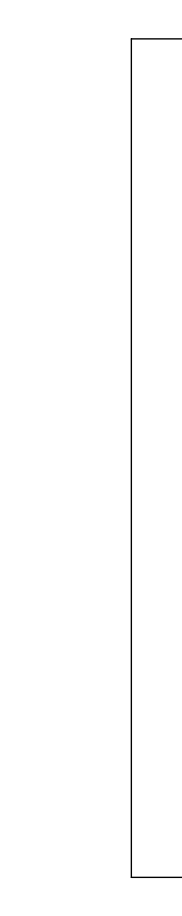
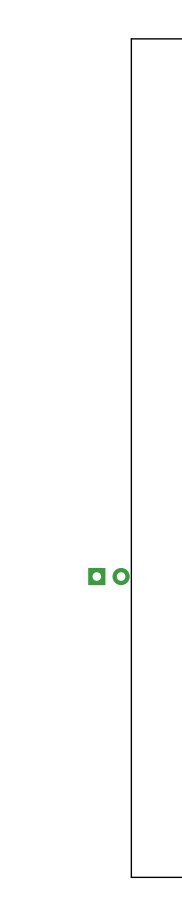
part: none -> (108, 576)

